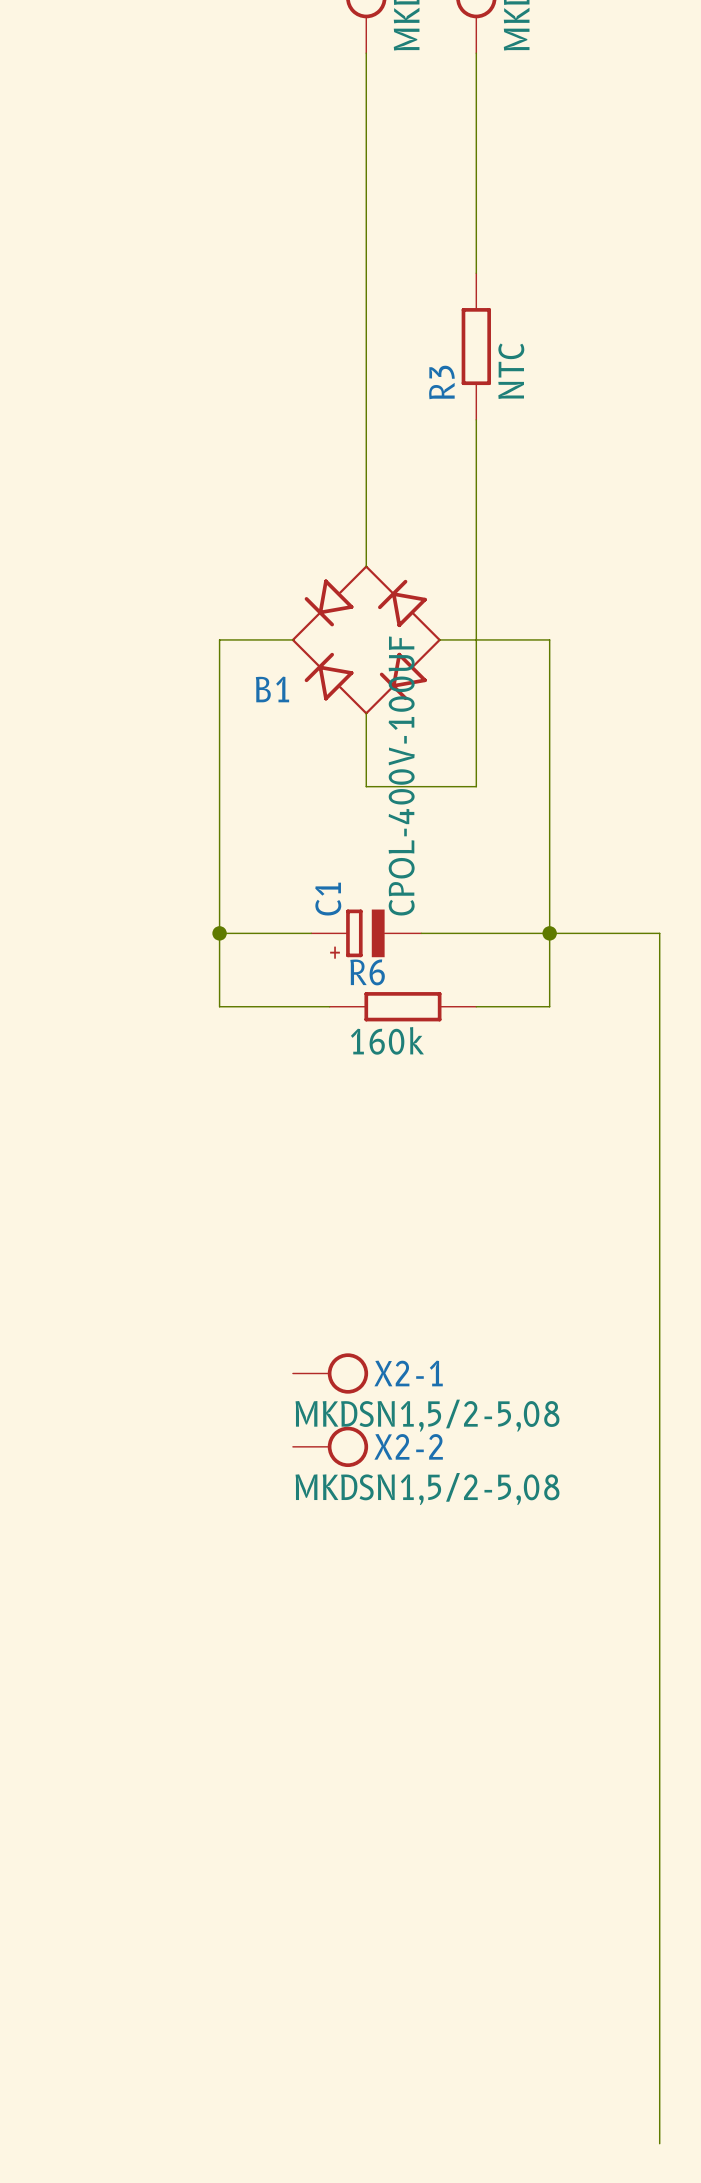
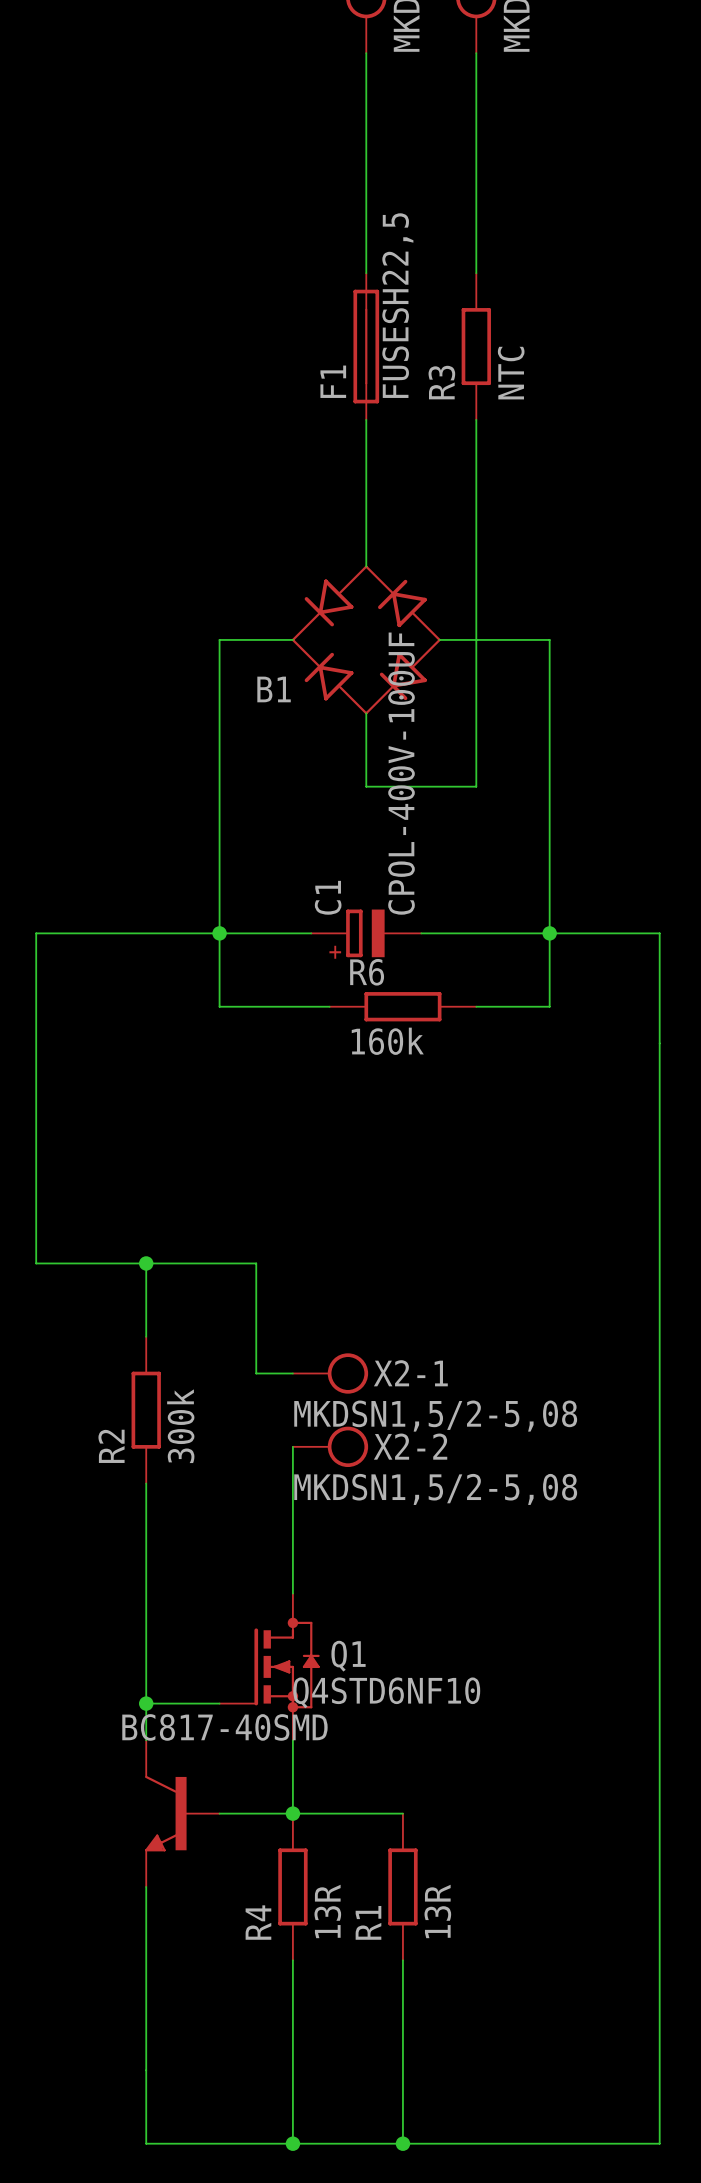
F1: none -> FUSESH22,5 (366, 346)
wire: none -> (219, 933) (36, 933) (36, 1263) (256, 1263) (256, 1373) (292, 1373)
wire: none -> (146, 1263) (146, 1336)
junction: none -> (146, 1263)
R2: none -> 300k (146, 1410)
wire: none -> (292, 1446) (292, 1593)
wire: none -> (146, 1483) (146, 1740)
Q1: none -> STD6NF10 (269, 1666)
wire: none -> (146, 1703) (219, 1703)
junction: none -> (146, 1703)
wire: none -> (292, 1740) (292, 1813)
Q4: none -> BC817-40SMD (182, 1813)
wire: none -> (219, 1813) (402, 1813)
junction: none -> (292, 1813)
wire: none -> (146, 1886) (146, 2143) (659, 2143)
R4: none -> 13R (292, 1886)
R1: none -> 13R (402, 1886)
wire: none -> (292, 1960) (292, 2143)
wire: none -> (402, 1960) (402, 2143)
junction: none -> (292, 2143)
junction: none -> (402, 2143)

